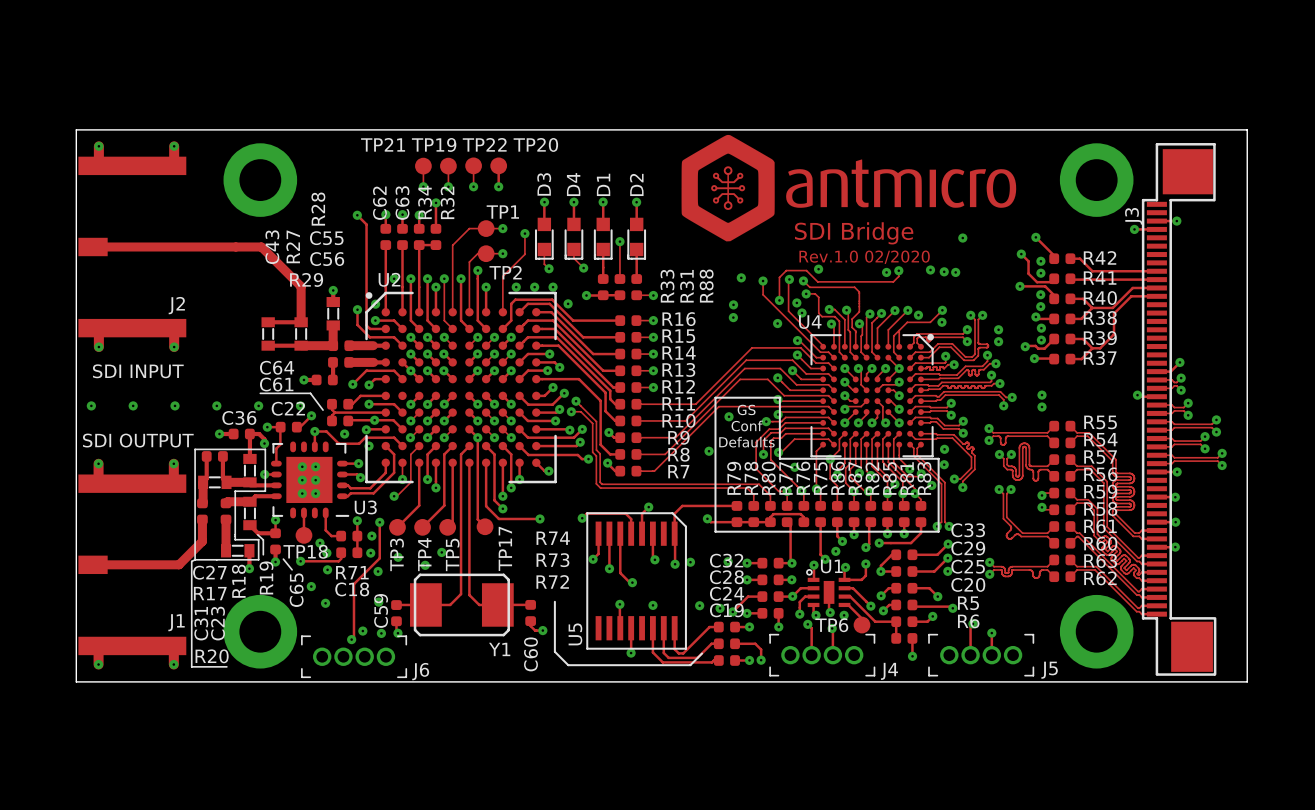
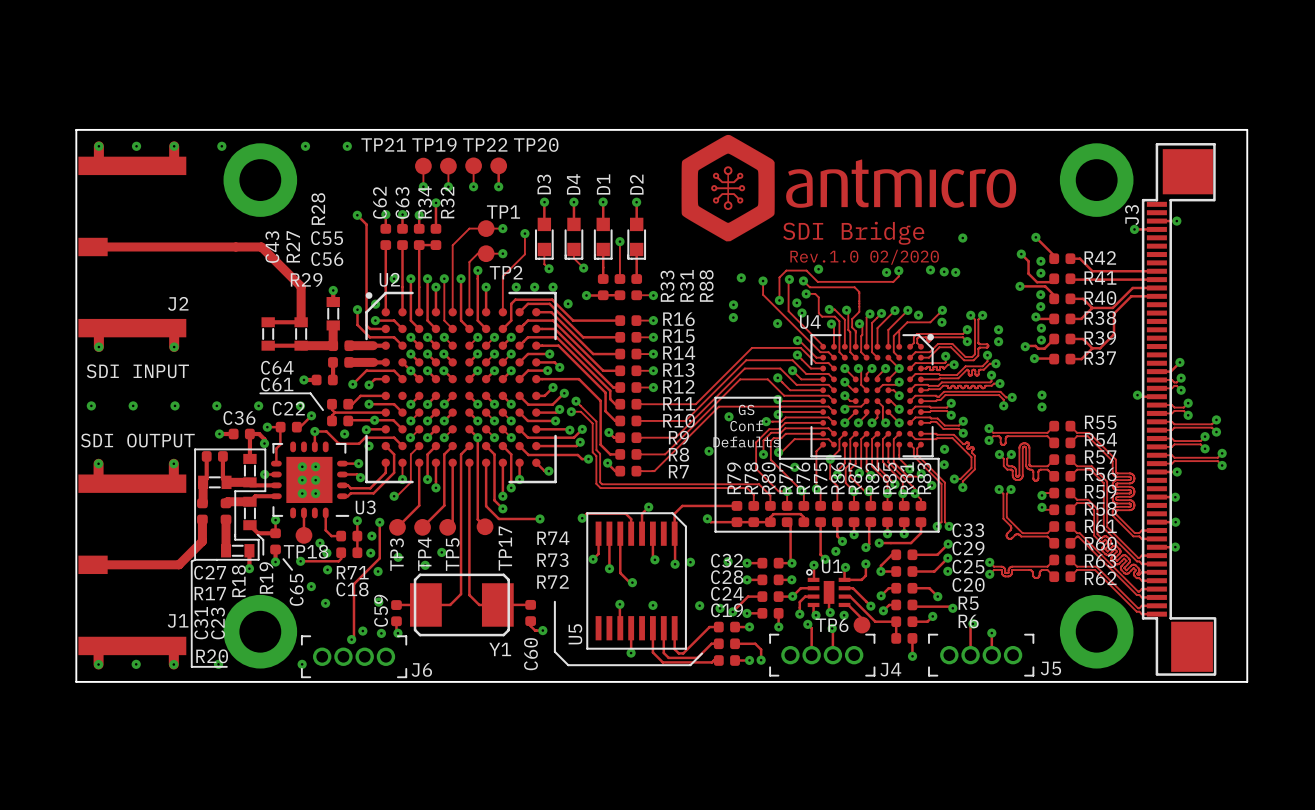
via: none -> (136, 146)
via: none -> (221, 146)
via: none -> (305, 146)
via: none -> (347, 146)
via: none -> (136, 664)
via: none -> (218, 664)
via: none -> (302, 664)

